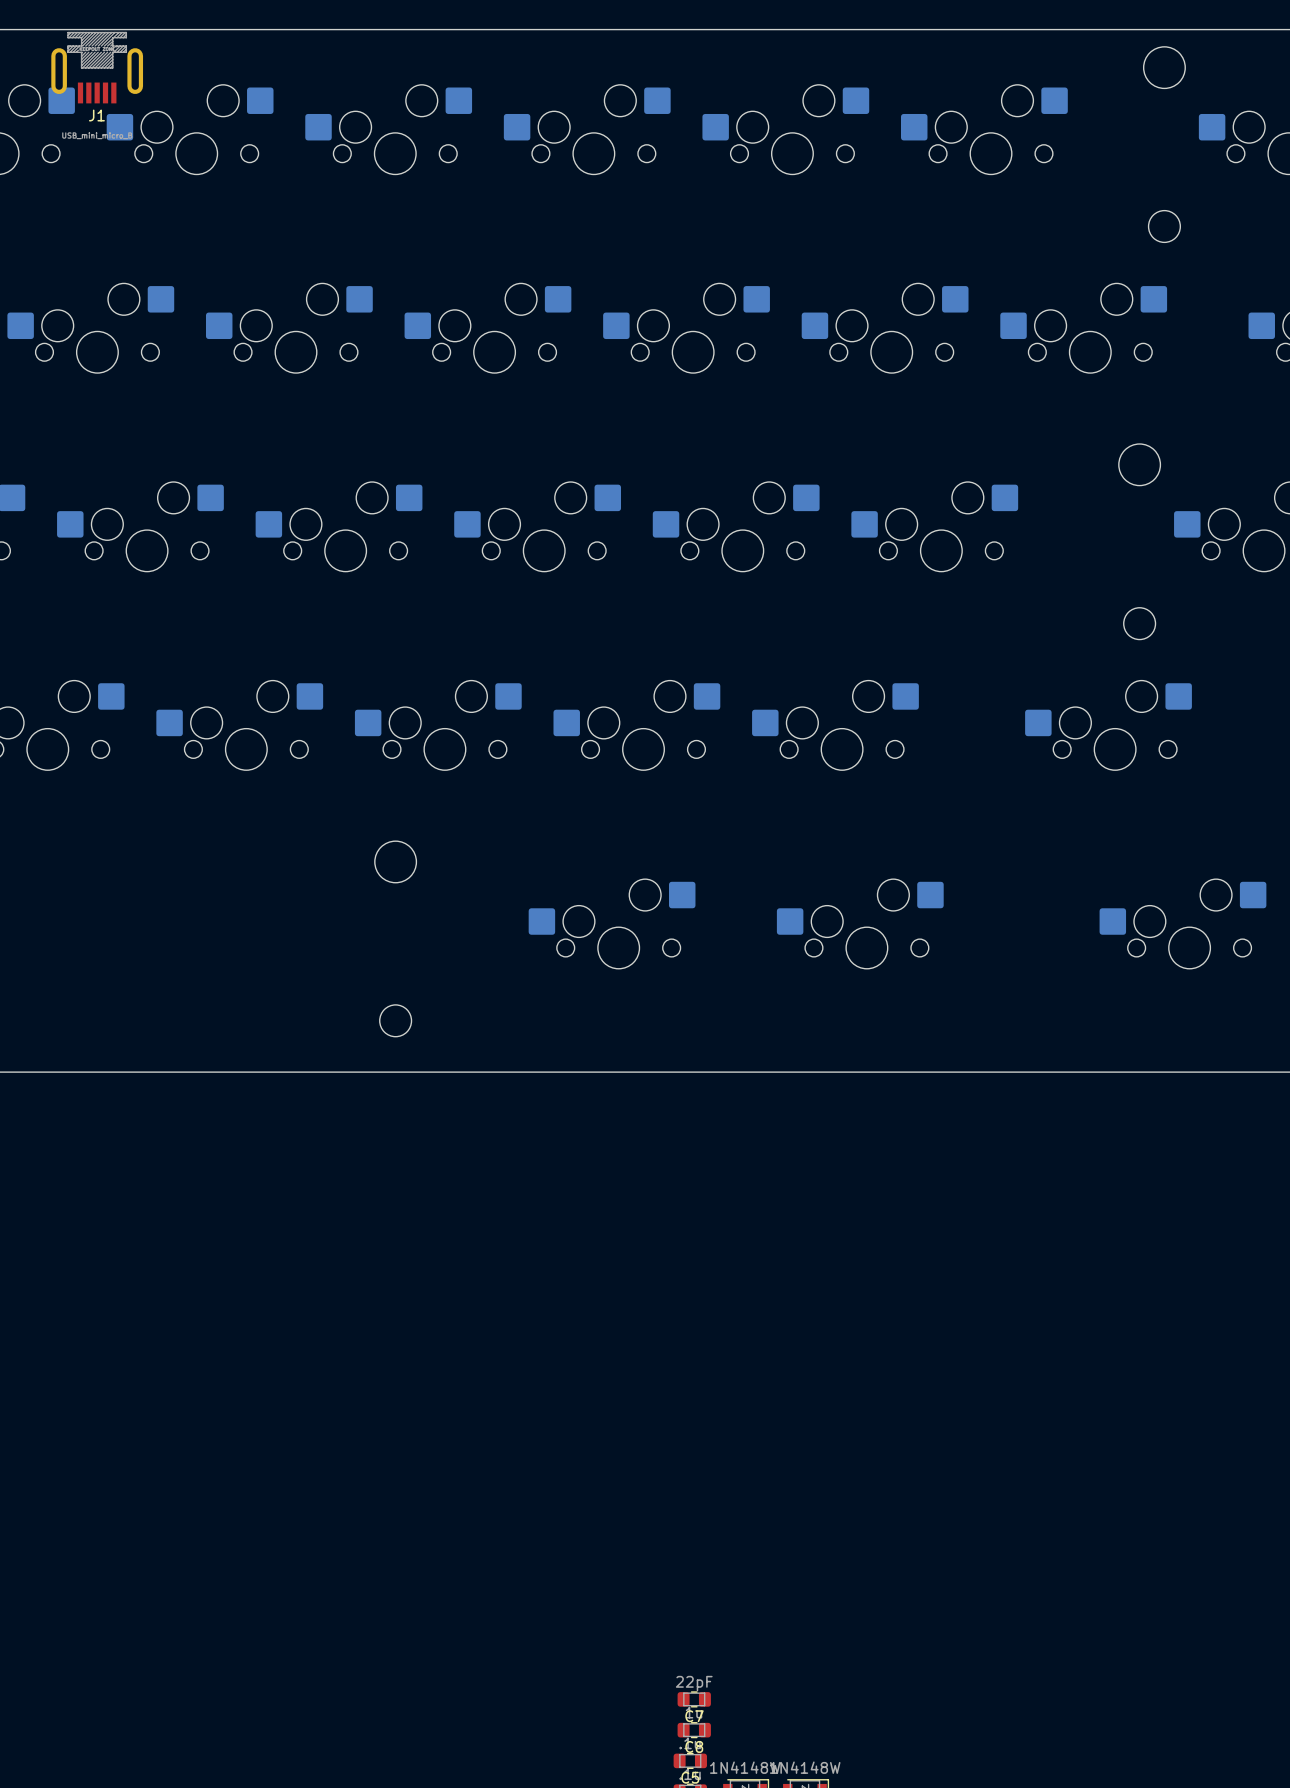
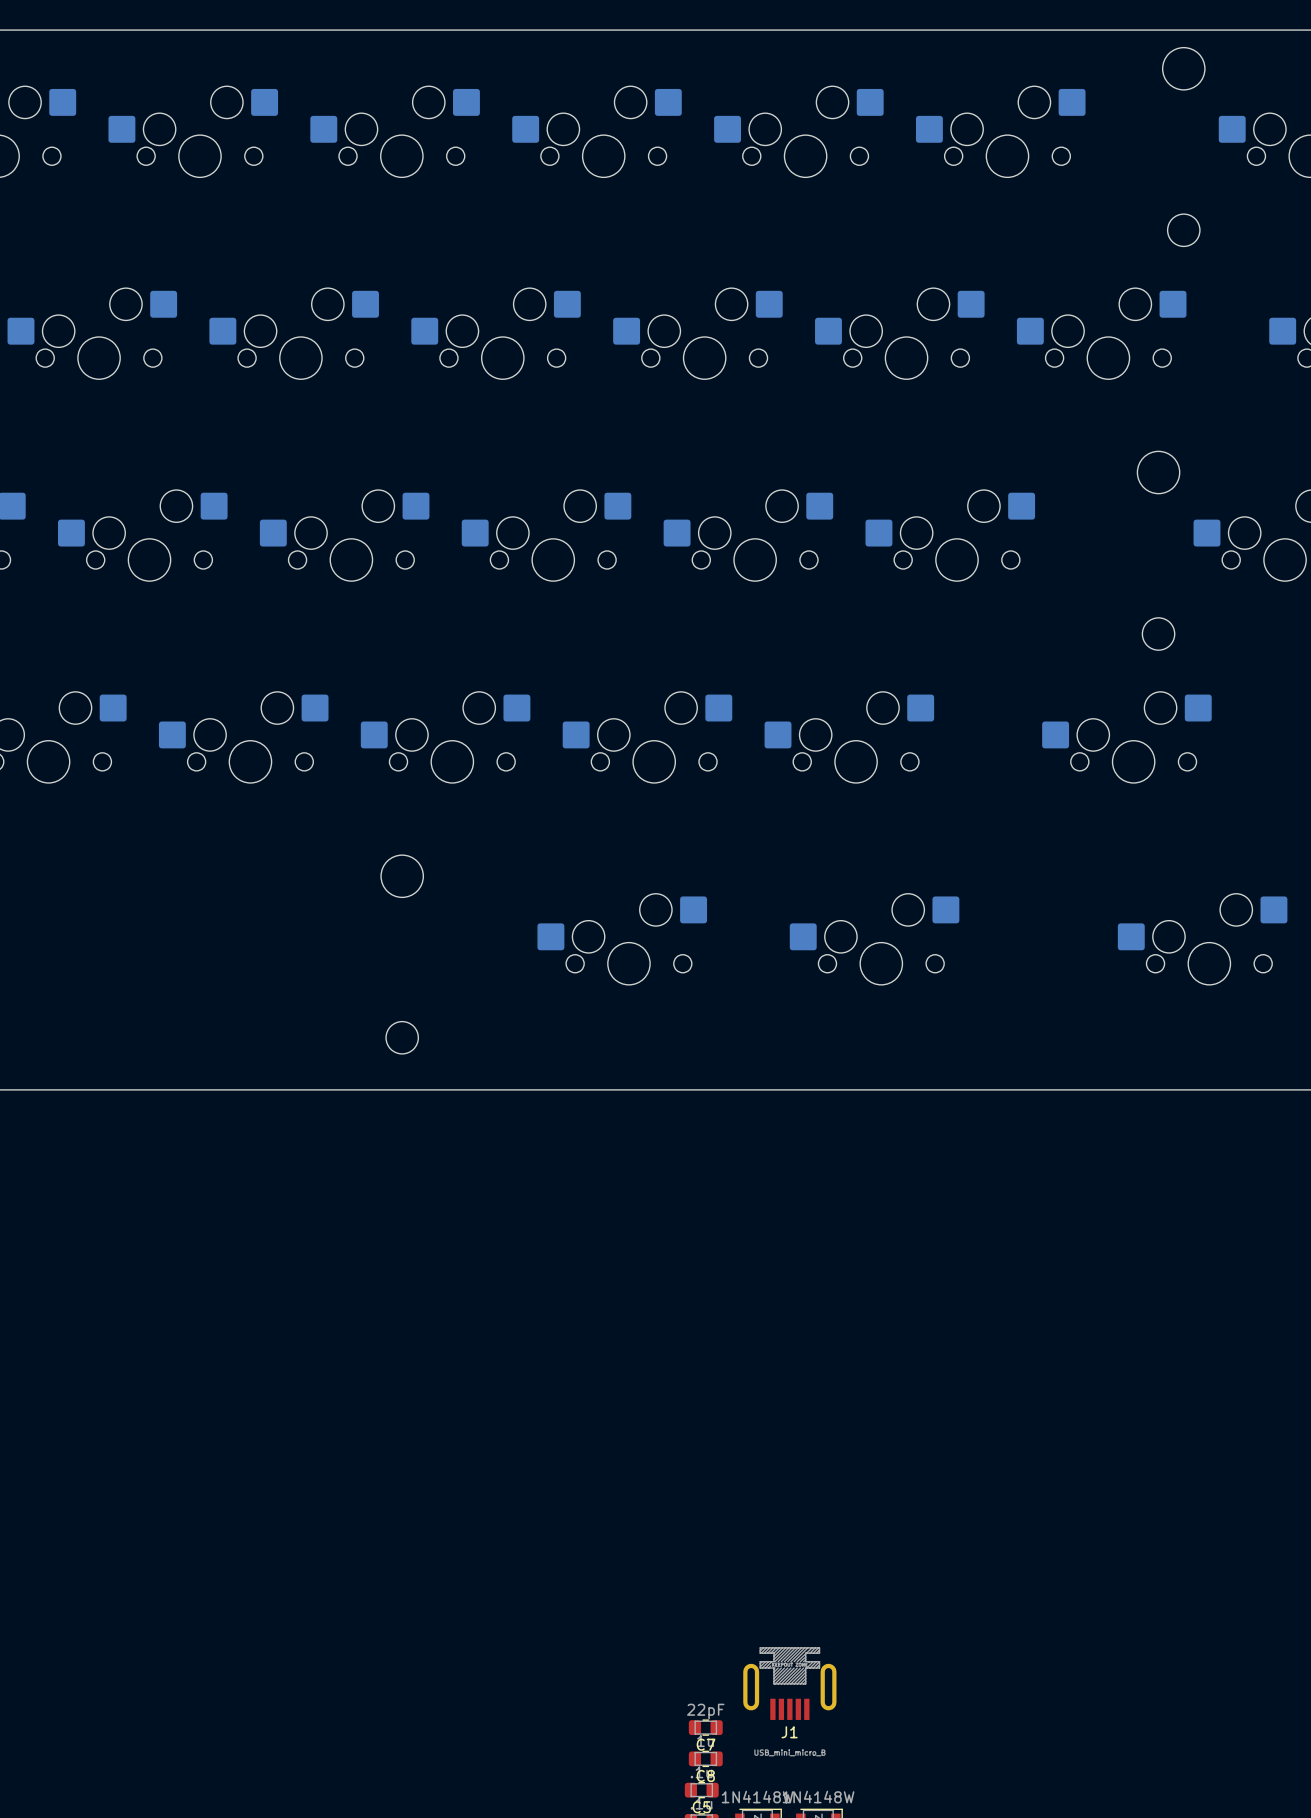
J1 position: (97, 67) -> (789, 1683)

